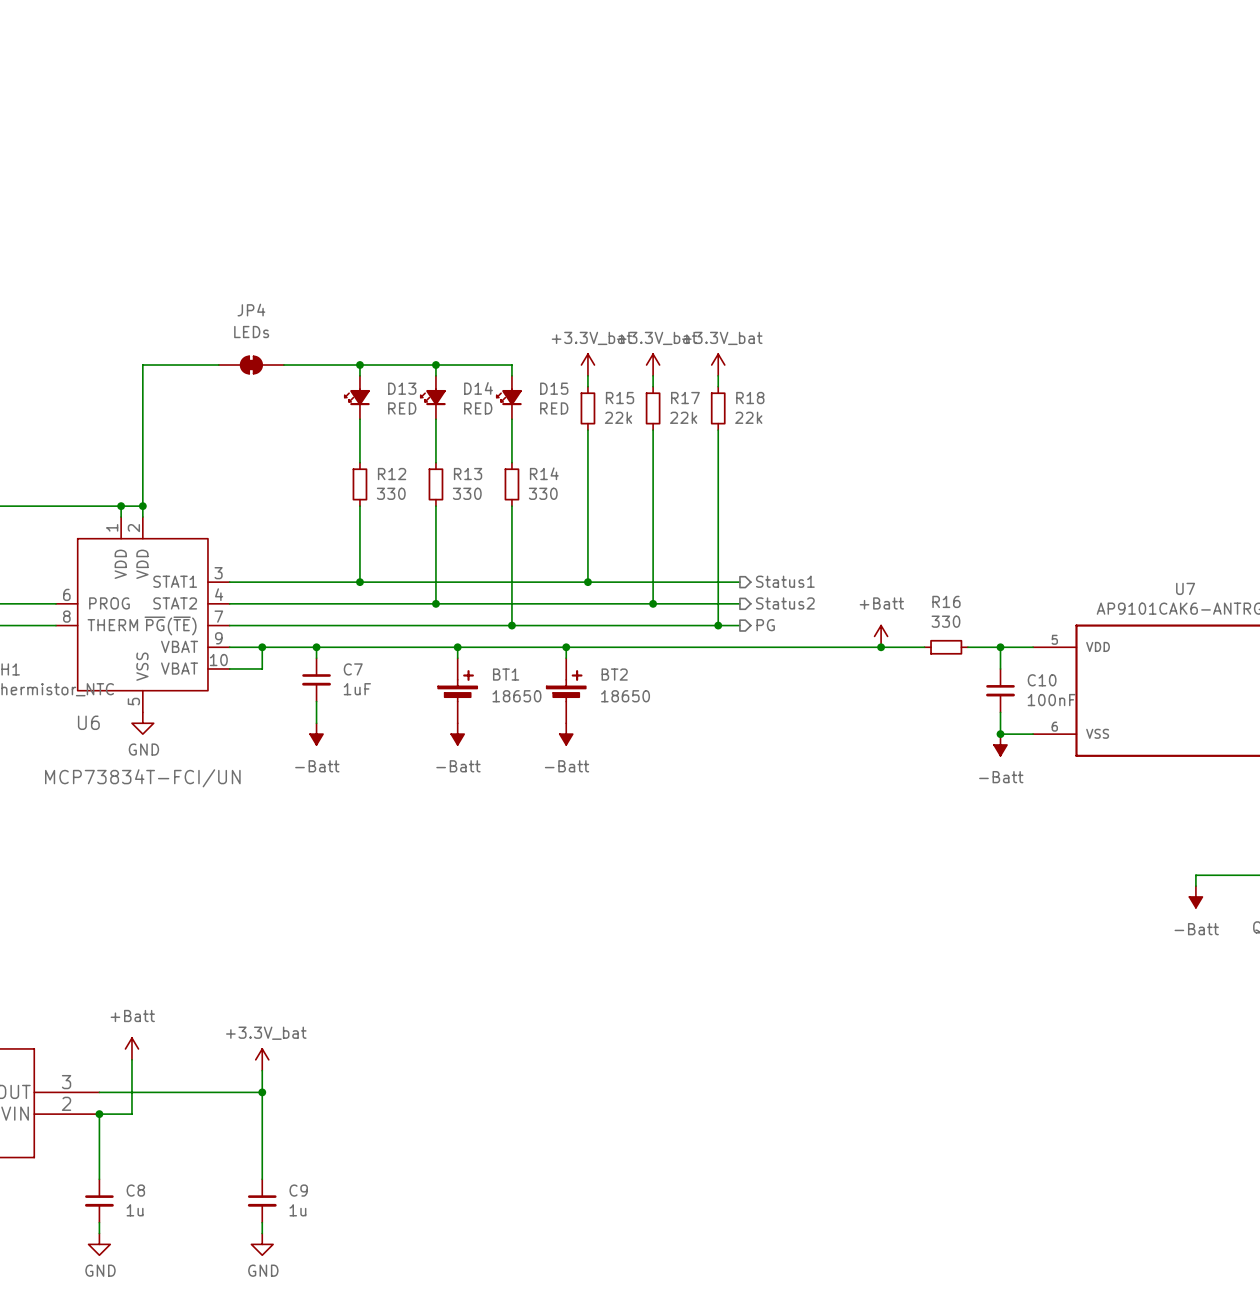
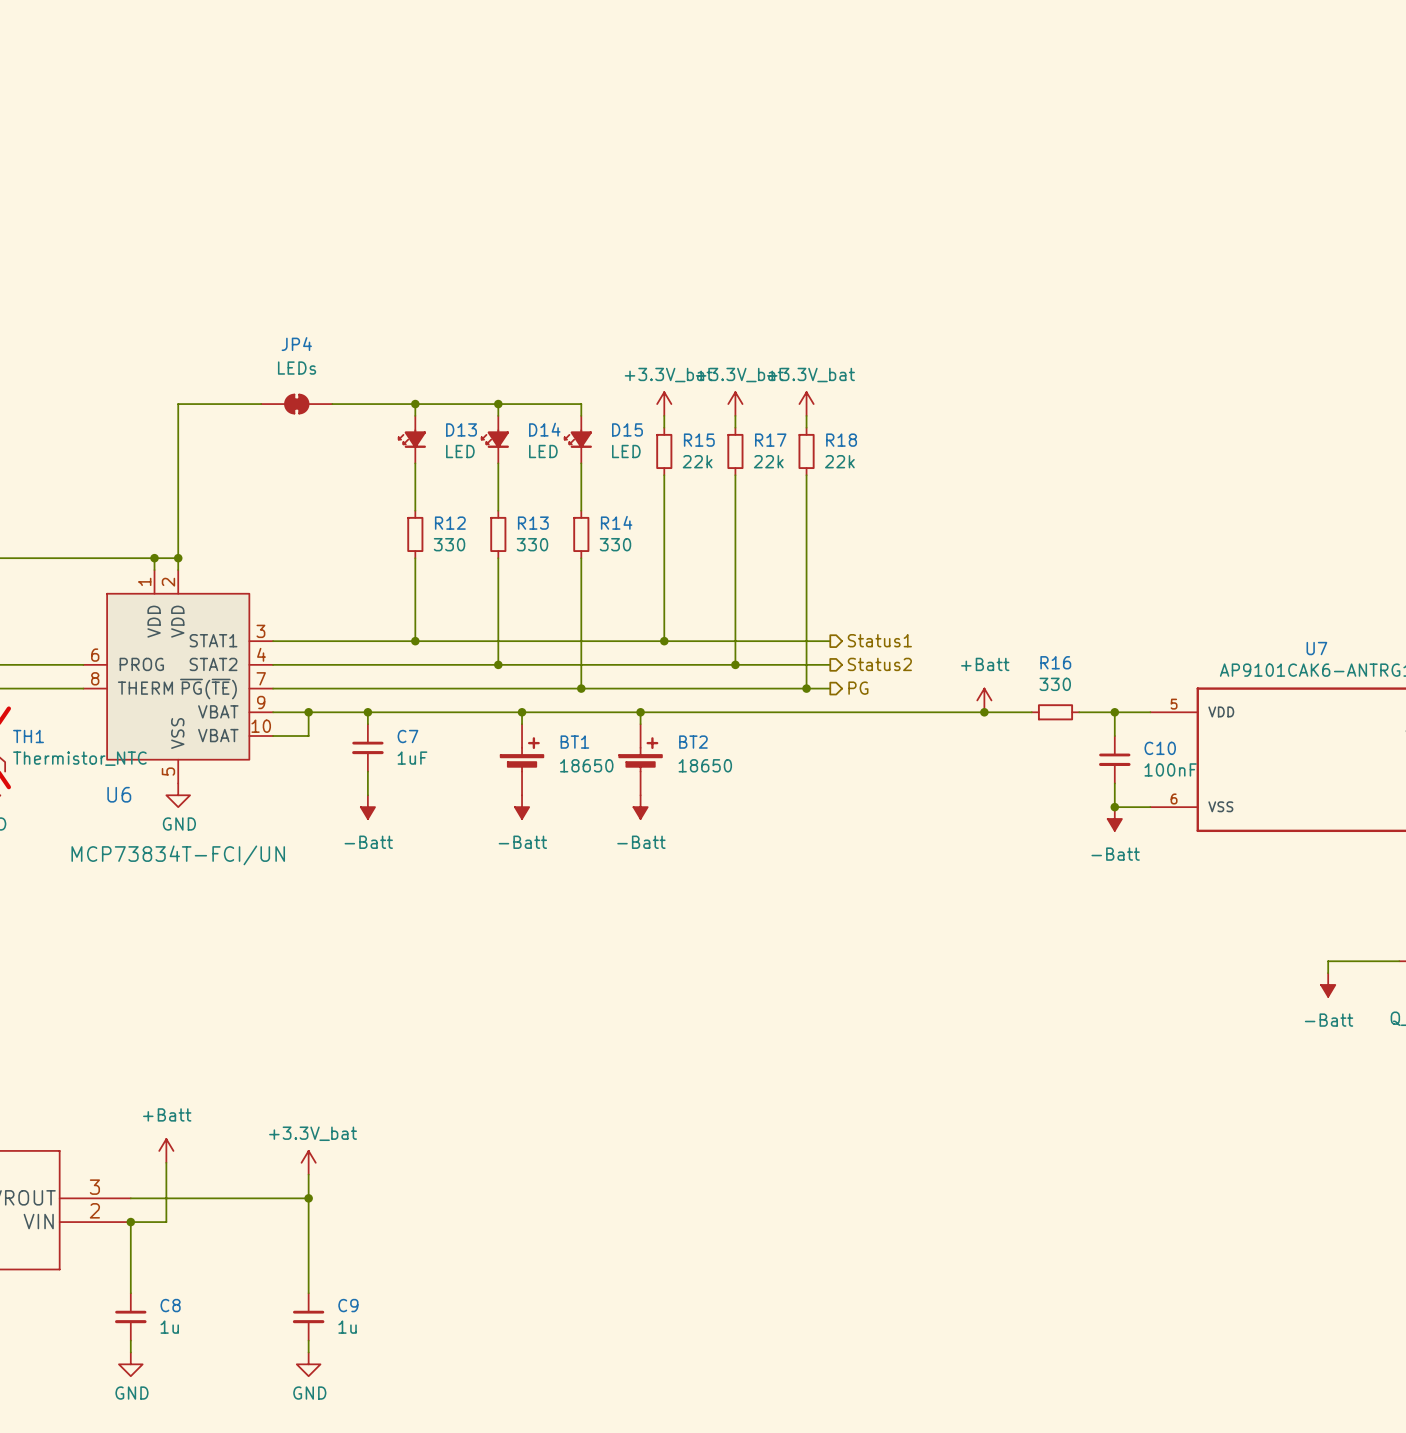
D13 value: RED (402, 408) -> LED (460, 451)
D14 value: RED (478, 408) -> LED (543, 451)
D15 value: RED (554, 408) -> LED (626, 451)

